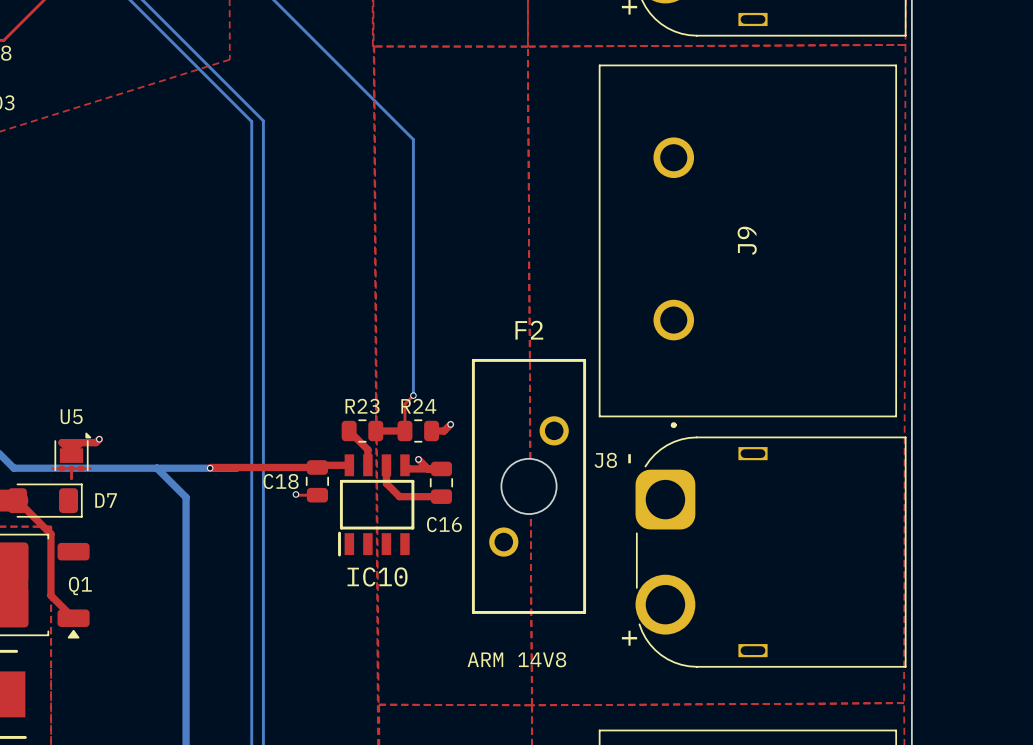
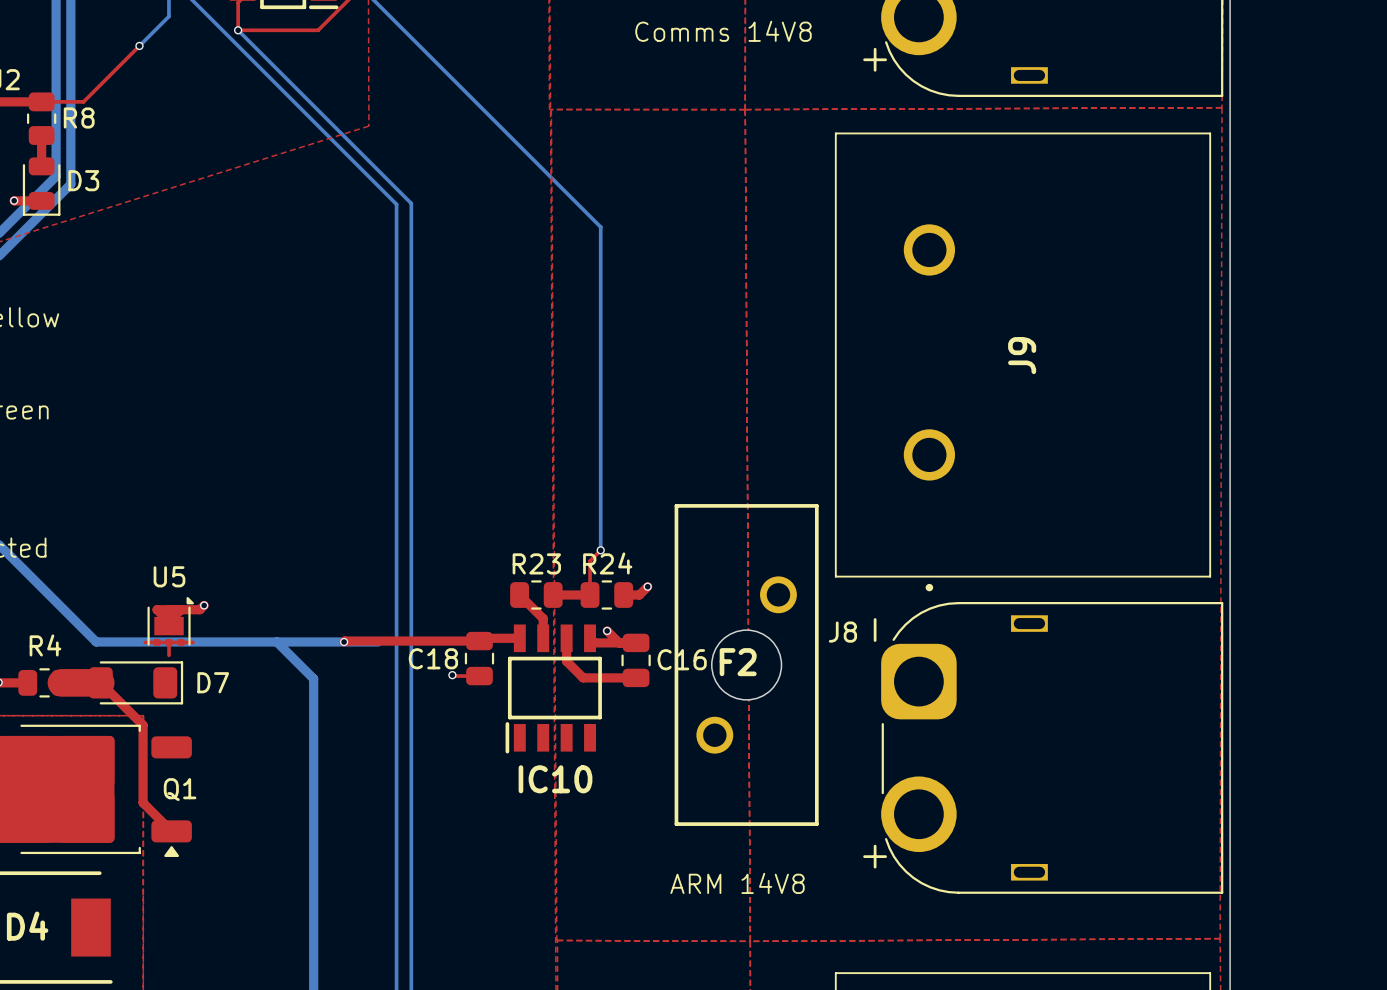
F2 name position: F2 (529, 330) -> F2 (738, 662)
C16 name position: C16 (444, 524) -> C16 (682, 659)

